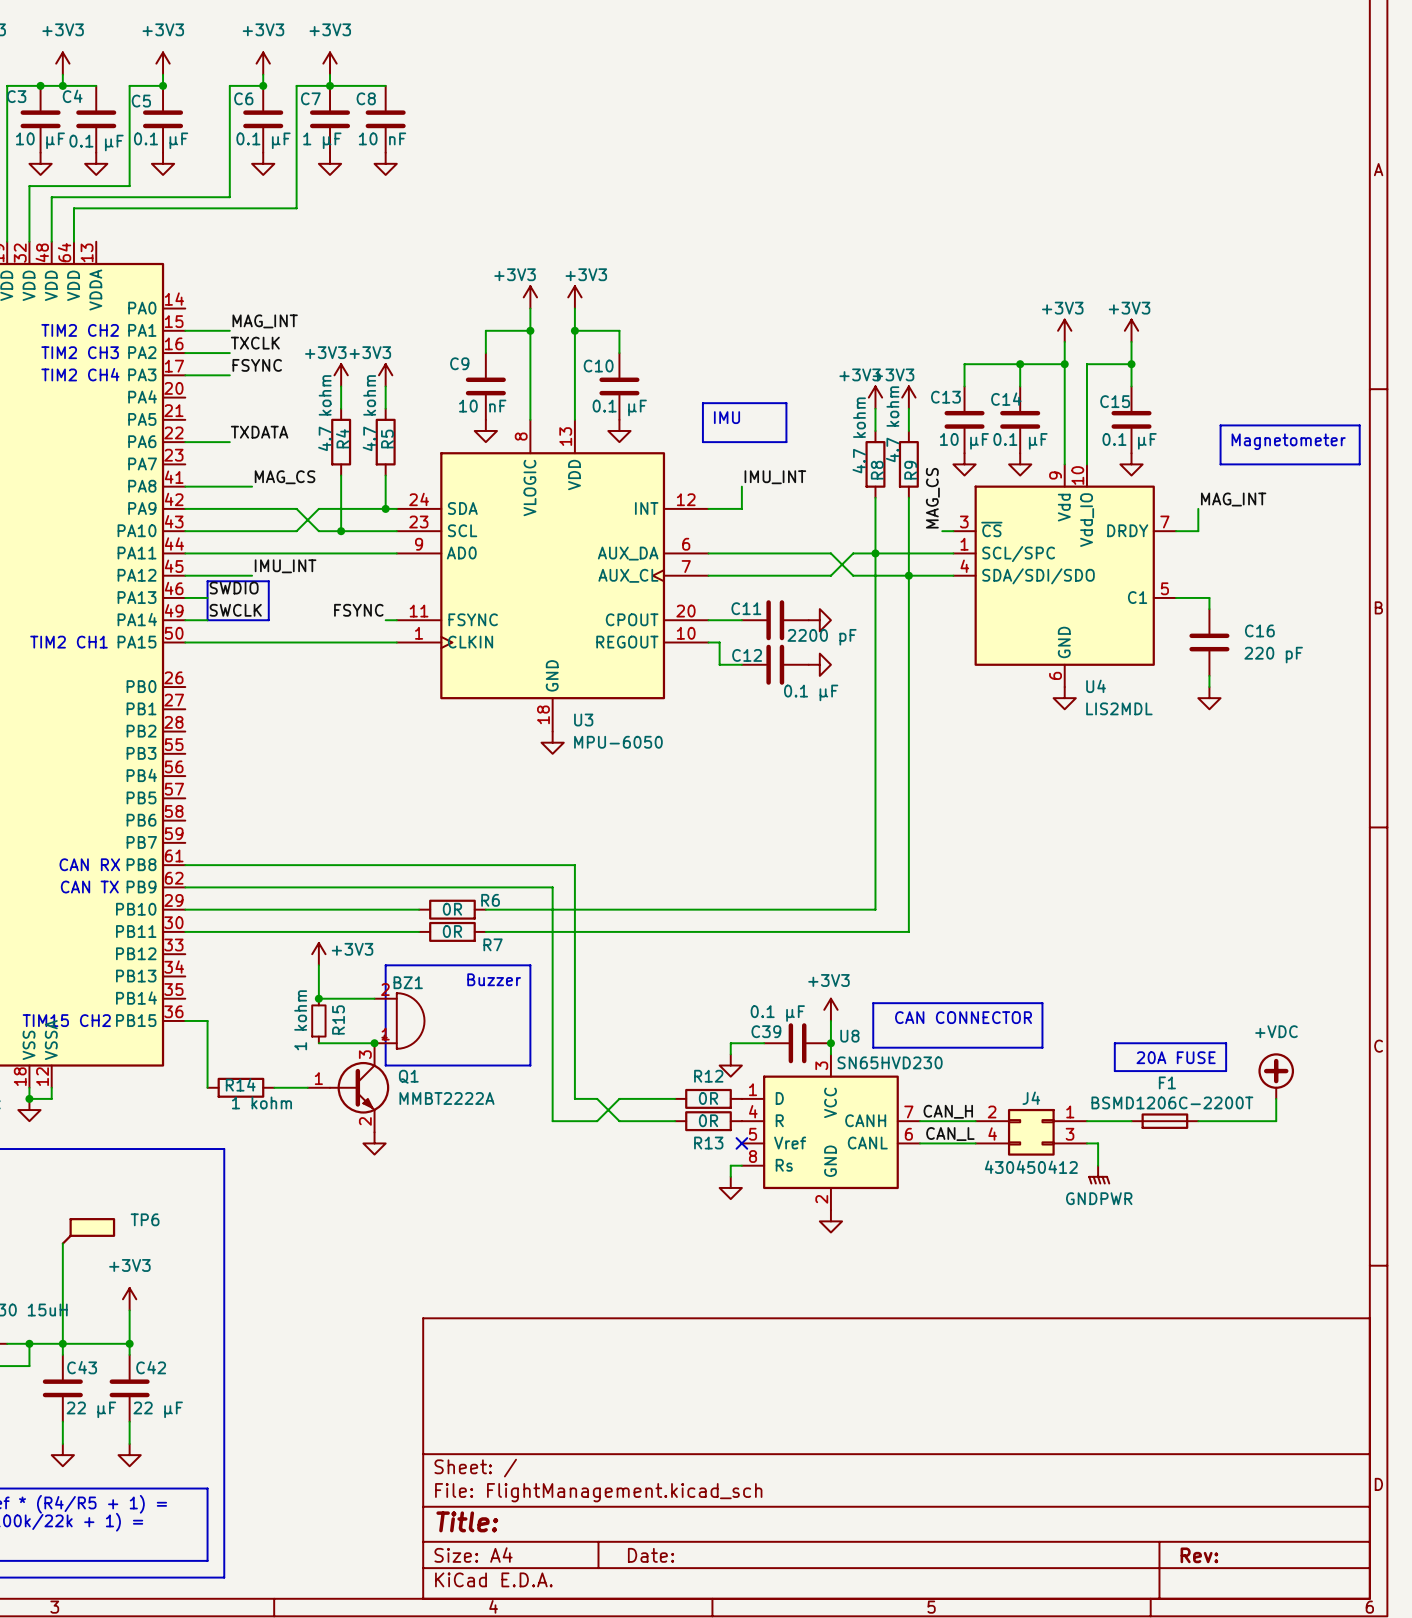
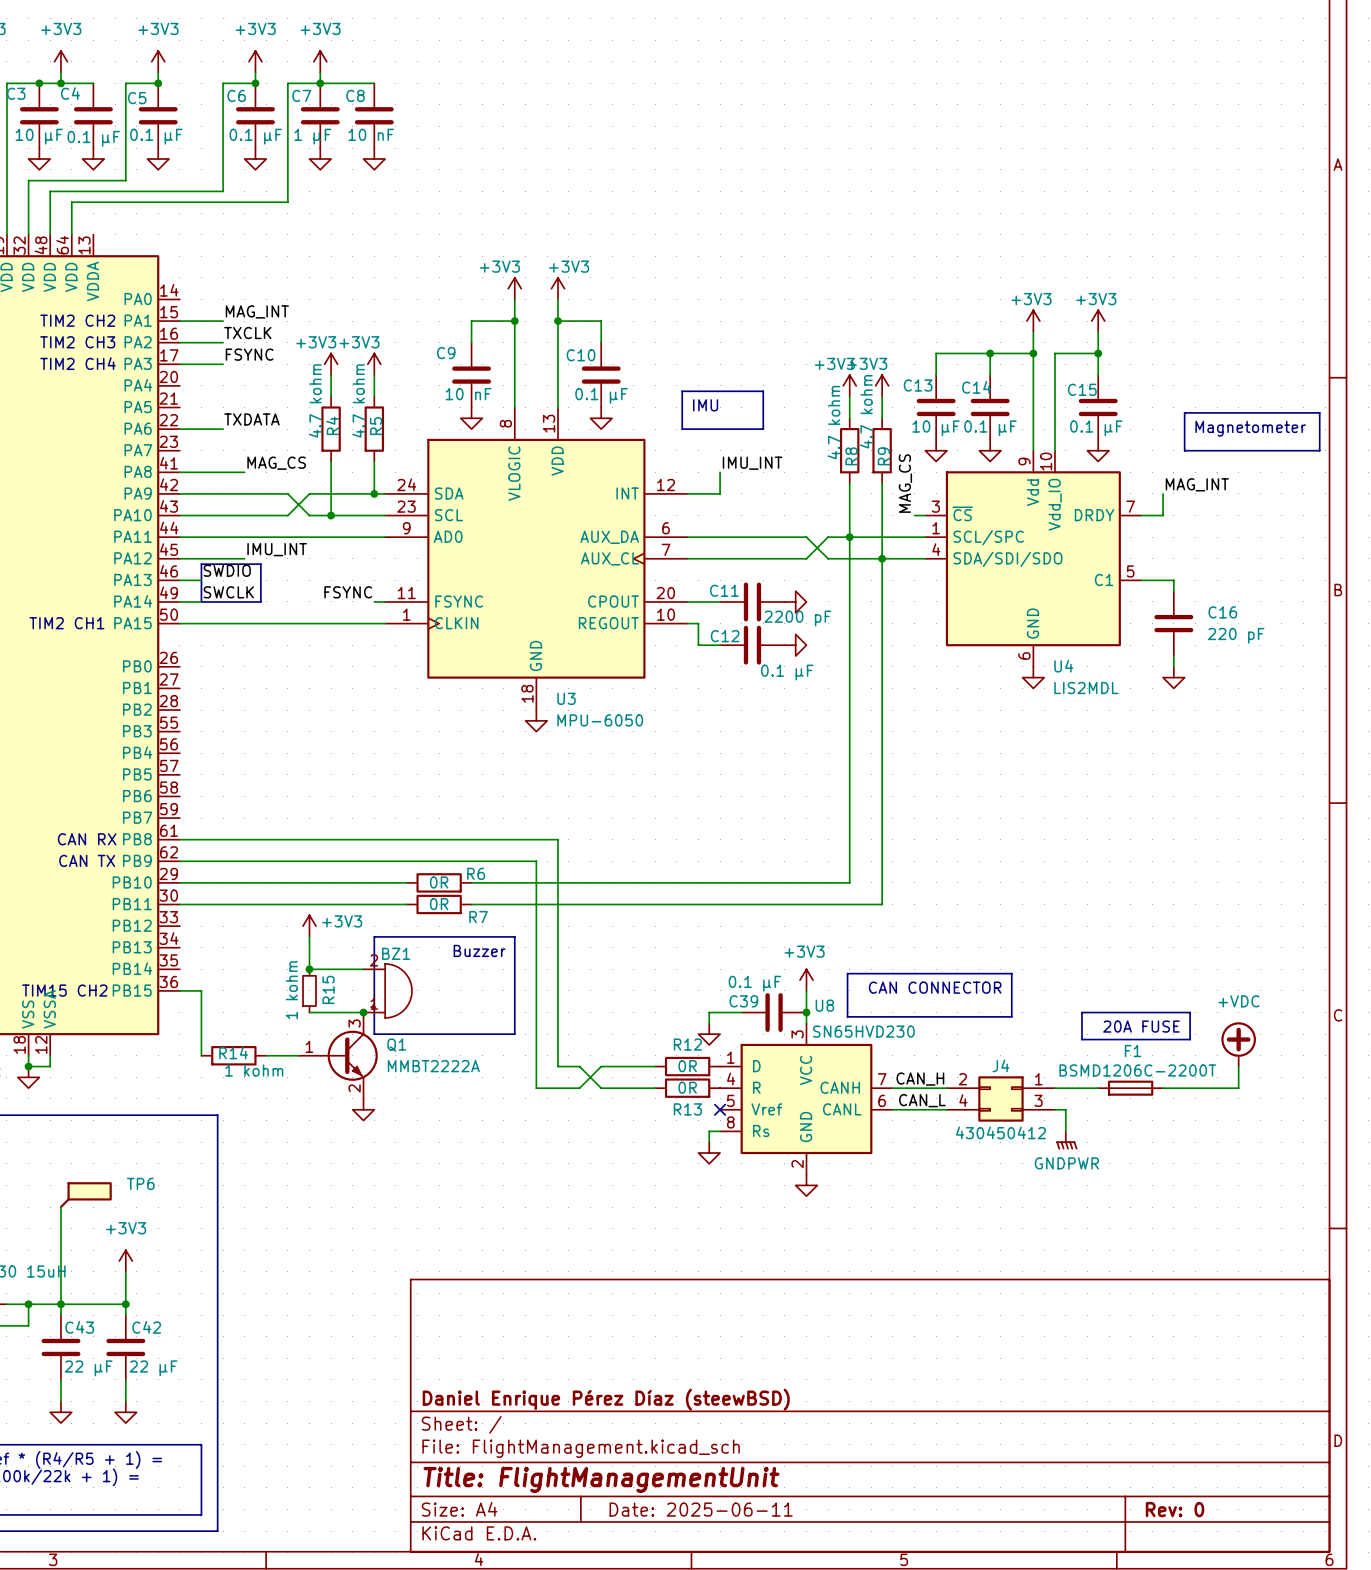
title block: none -> Daniel Enrique Pérez Díaz (steewBSD) (606, 1399)
title block: Title: (467, 1521) -> Title: FlightManagementUnit (601, 1479)
title block: Date: (651, 1555) -> Date: 2025-06-11 (701, 1509)
title block: Rev: (1199, 1555) -> Rev: 0 (1175, 1509)

